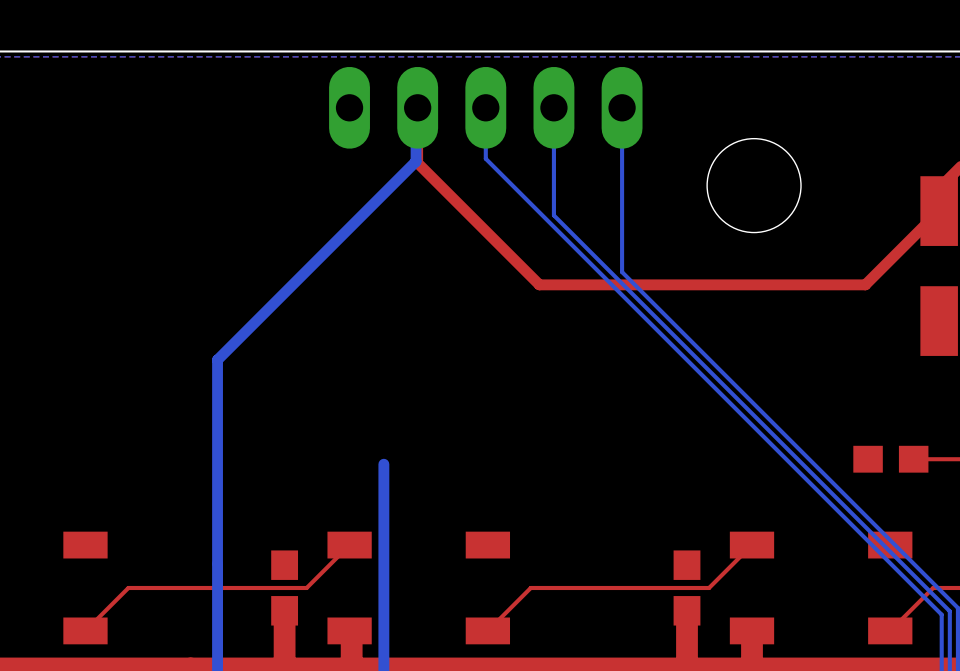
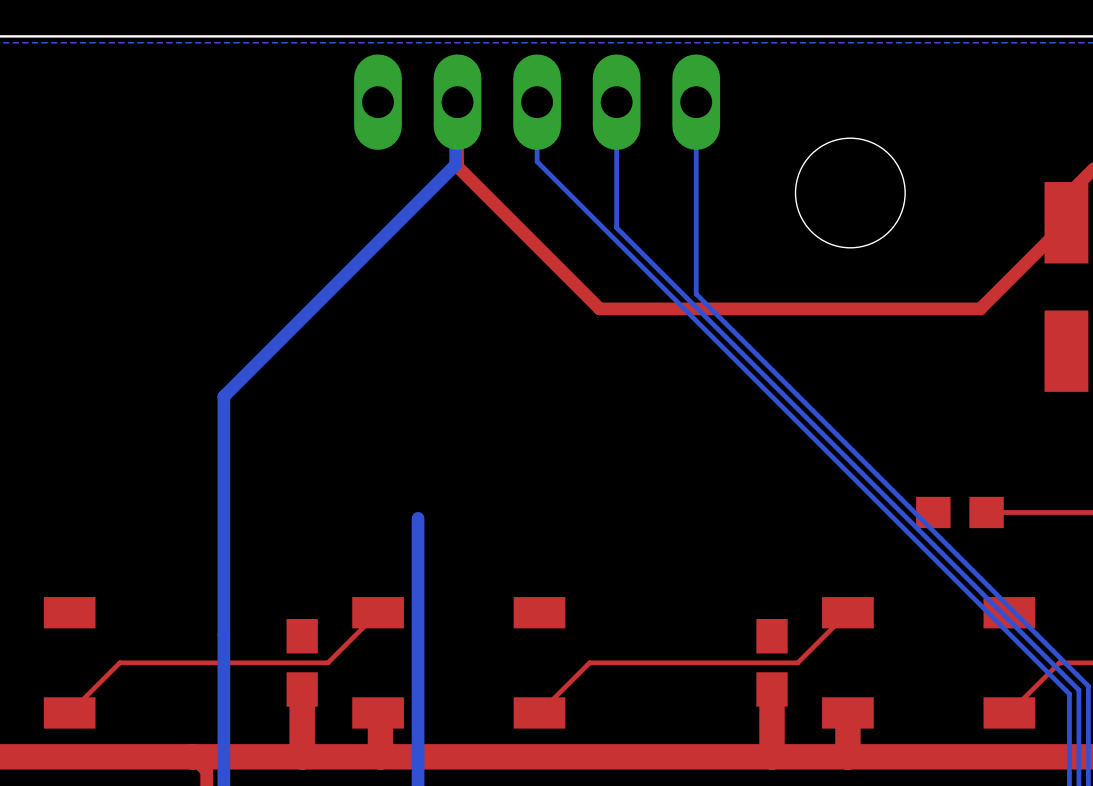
part position: (890, 459) -> (959, 512)
top track: none -> (1036, 512) (986, 512)

